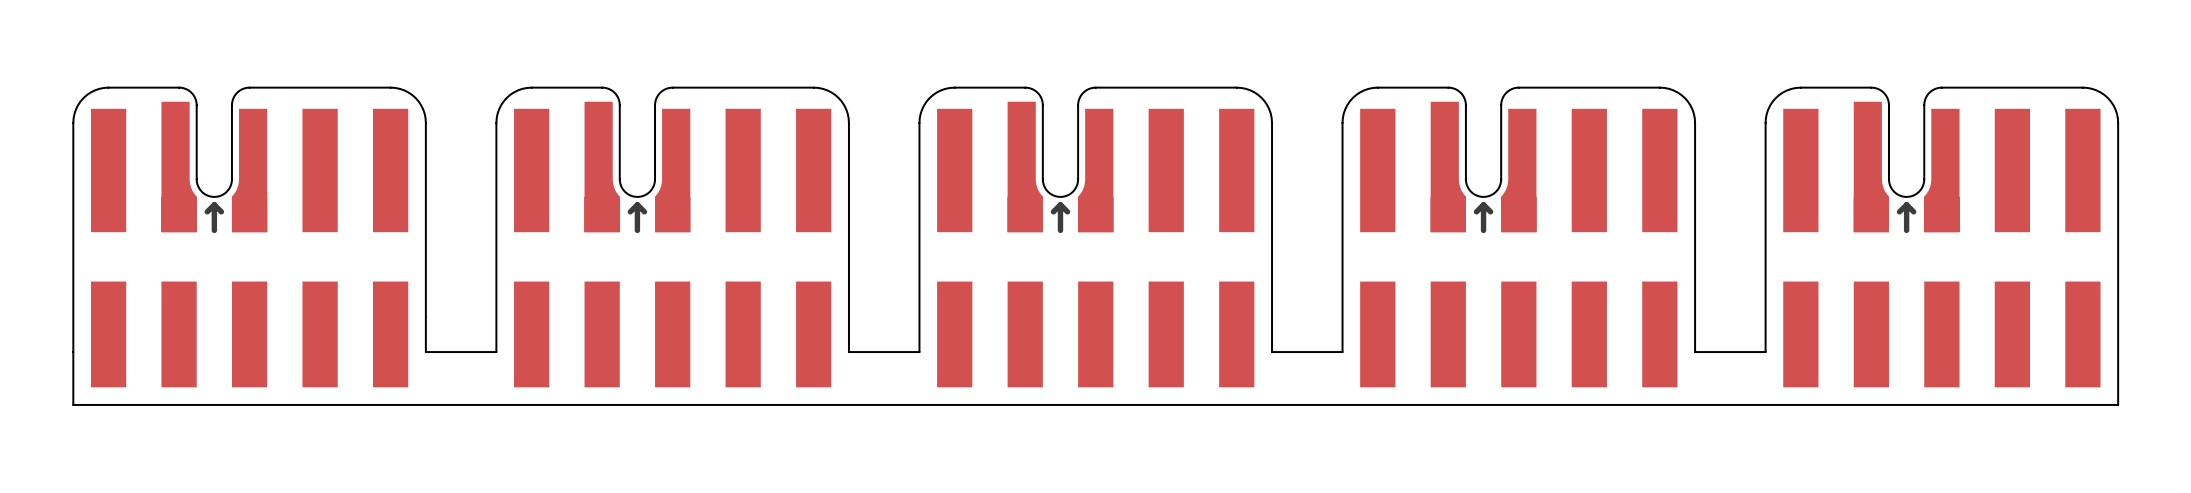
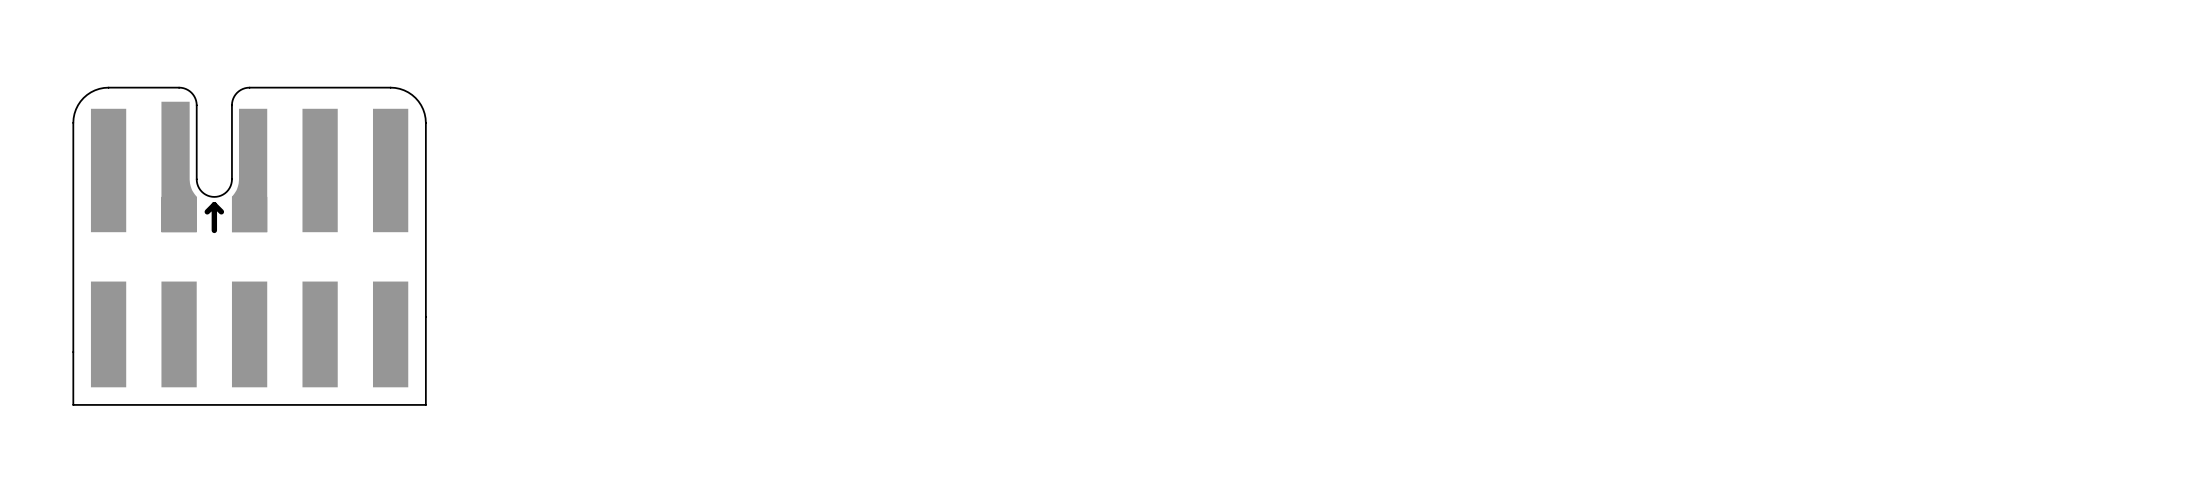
board edge: (531, 87) (522, 88) (510, 94) (501, 105) (496, 118) (496, 352) (425, 352) -> (425, 404) (425, 352)
board edge: (813, 87) (822, 88) (835, 94) (844, 105) (848, 118) (848, 352) (919, 352) (919, 118) (924, 105) (933, 94) (945, 88) (954, 87) -> none
board edge: (1236, 87) (1245, 88) (1258, 94) (1267, 105) (1271, 118) (1272, 352) (1342, 352) (1342, 118) (1347, 105) (1356, 94) (1368, 88) (1377, 87) -> none
board edge: (1659, 87) (1668, 88) (1681, 94) (1690, 105) (1694, 118) (1695, 352) (1765, 352) (1765, 118) (1770, 105) (1779, 94) (1791, 88) (1800, 87) -> none
board edge: (2082, 87) (2092, 88) (2104, 94) (2113, 105) (2117, 118) (2118, 404) (425, 404) -> none
part: (672, 159) -> none
part: (1095, 159) -> none
part: (1518, 159) -> none
part: (1941, 159) -> none
part: (672, 334) -> none
part: (1095, 334) -> none
part: (1518, 334) -> none
part: (1941, 334) -> none

